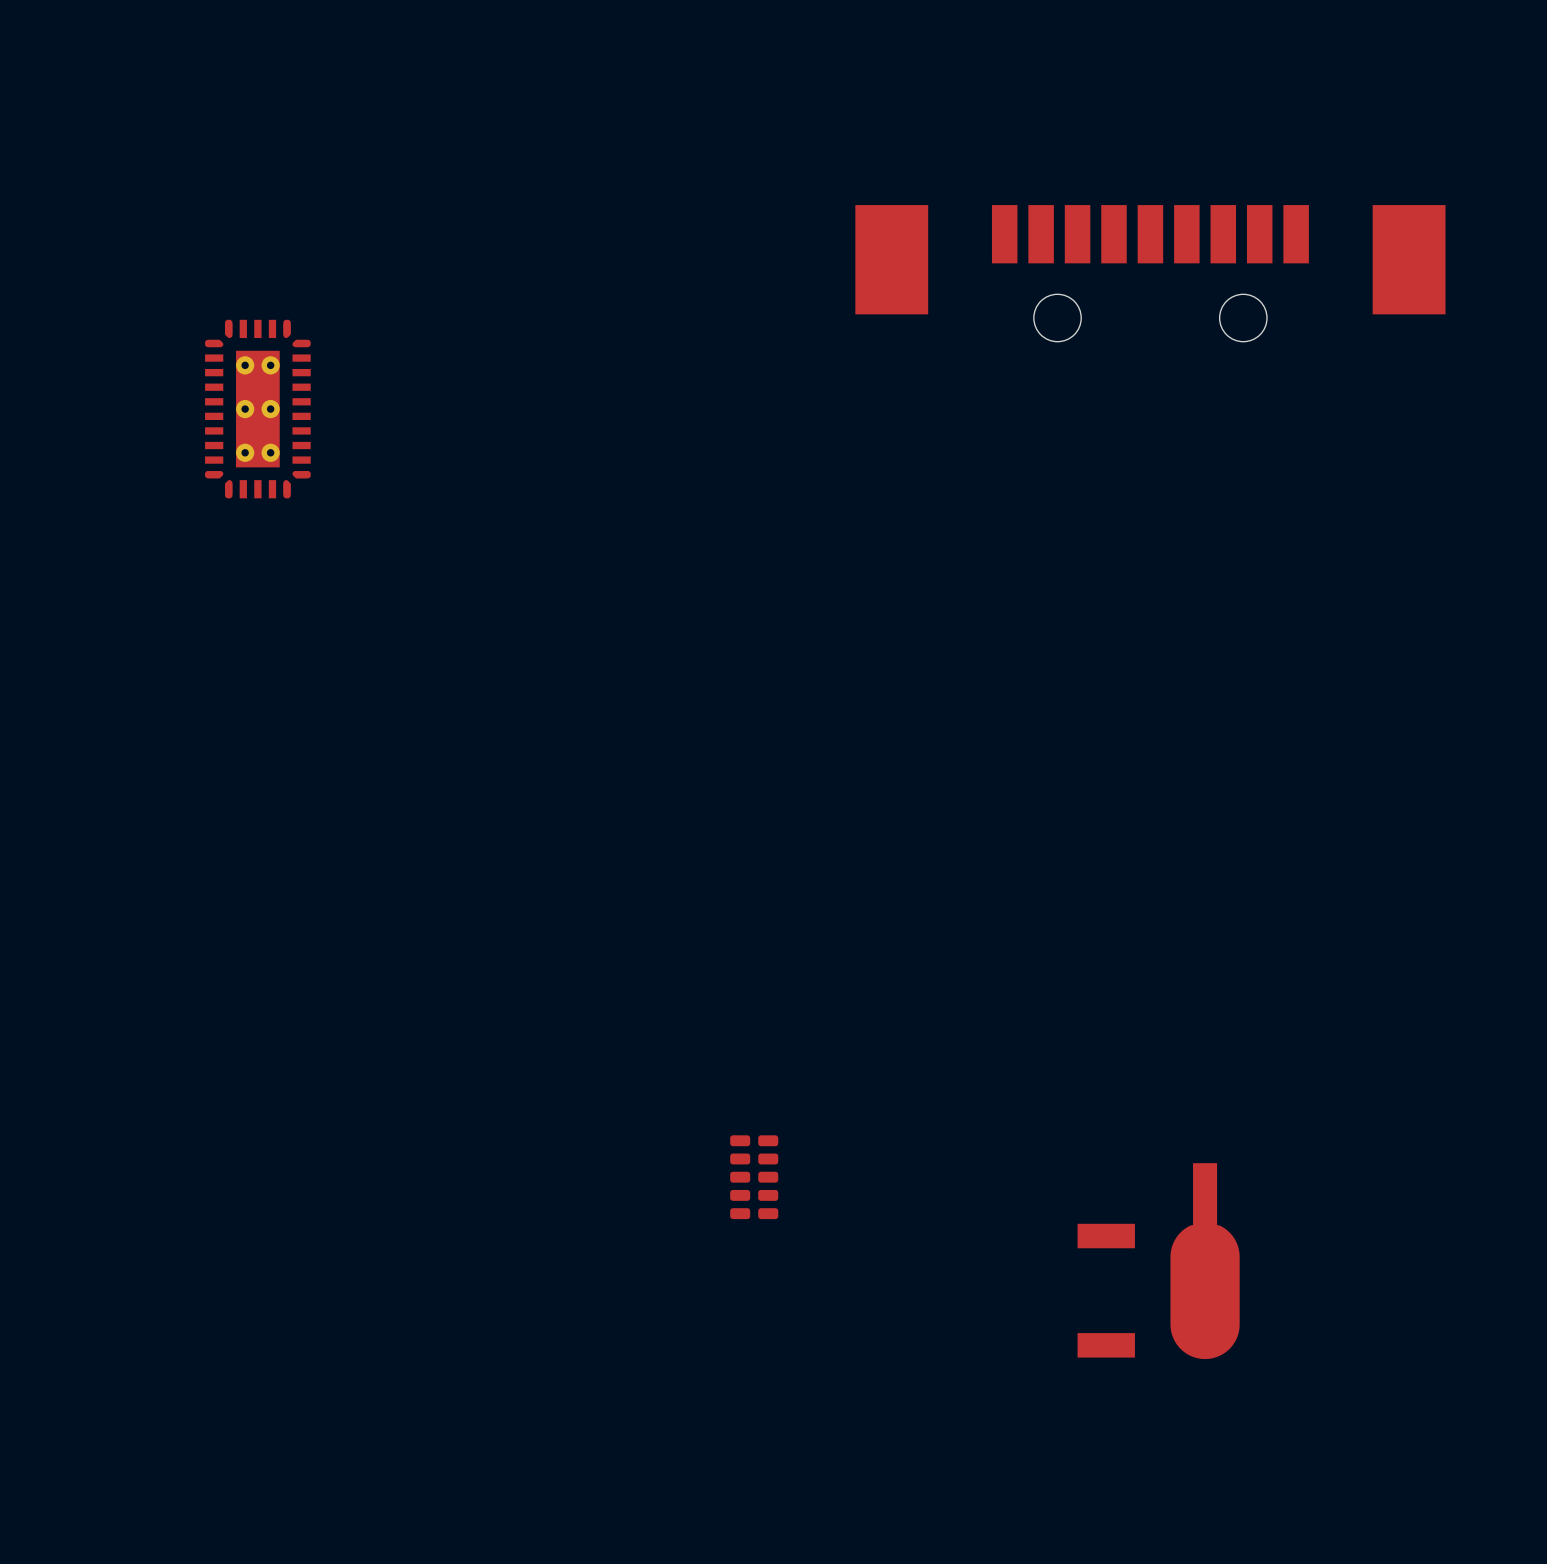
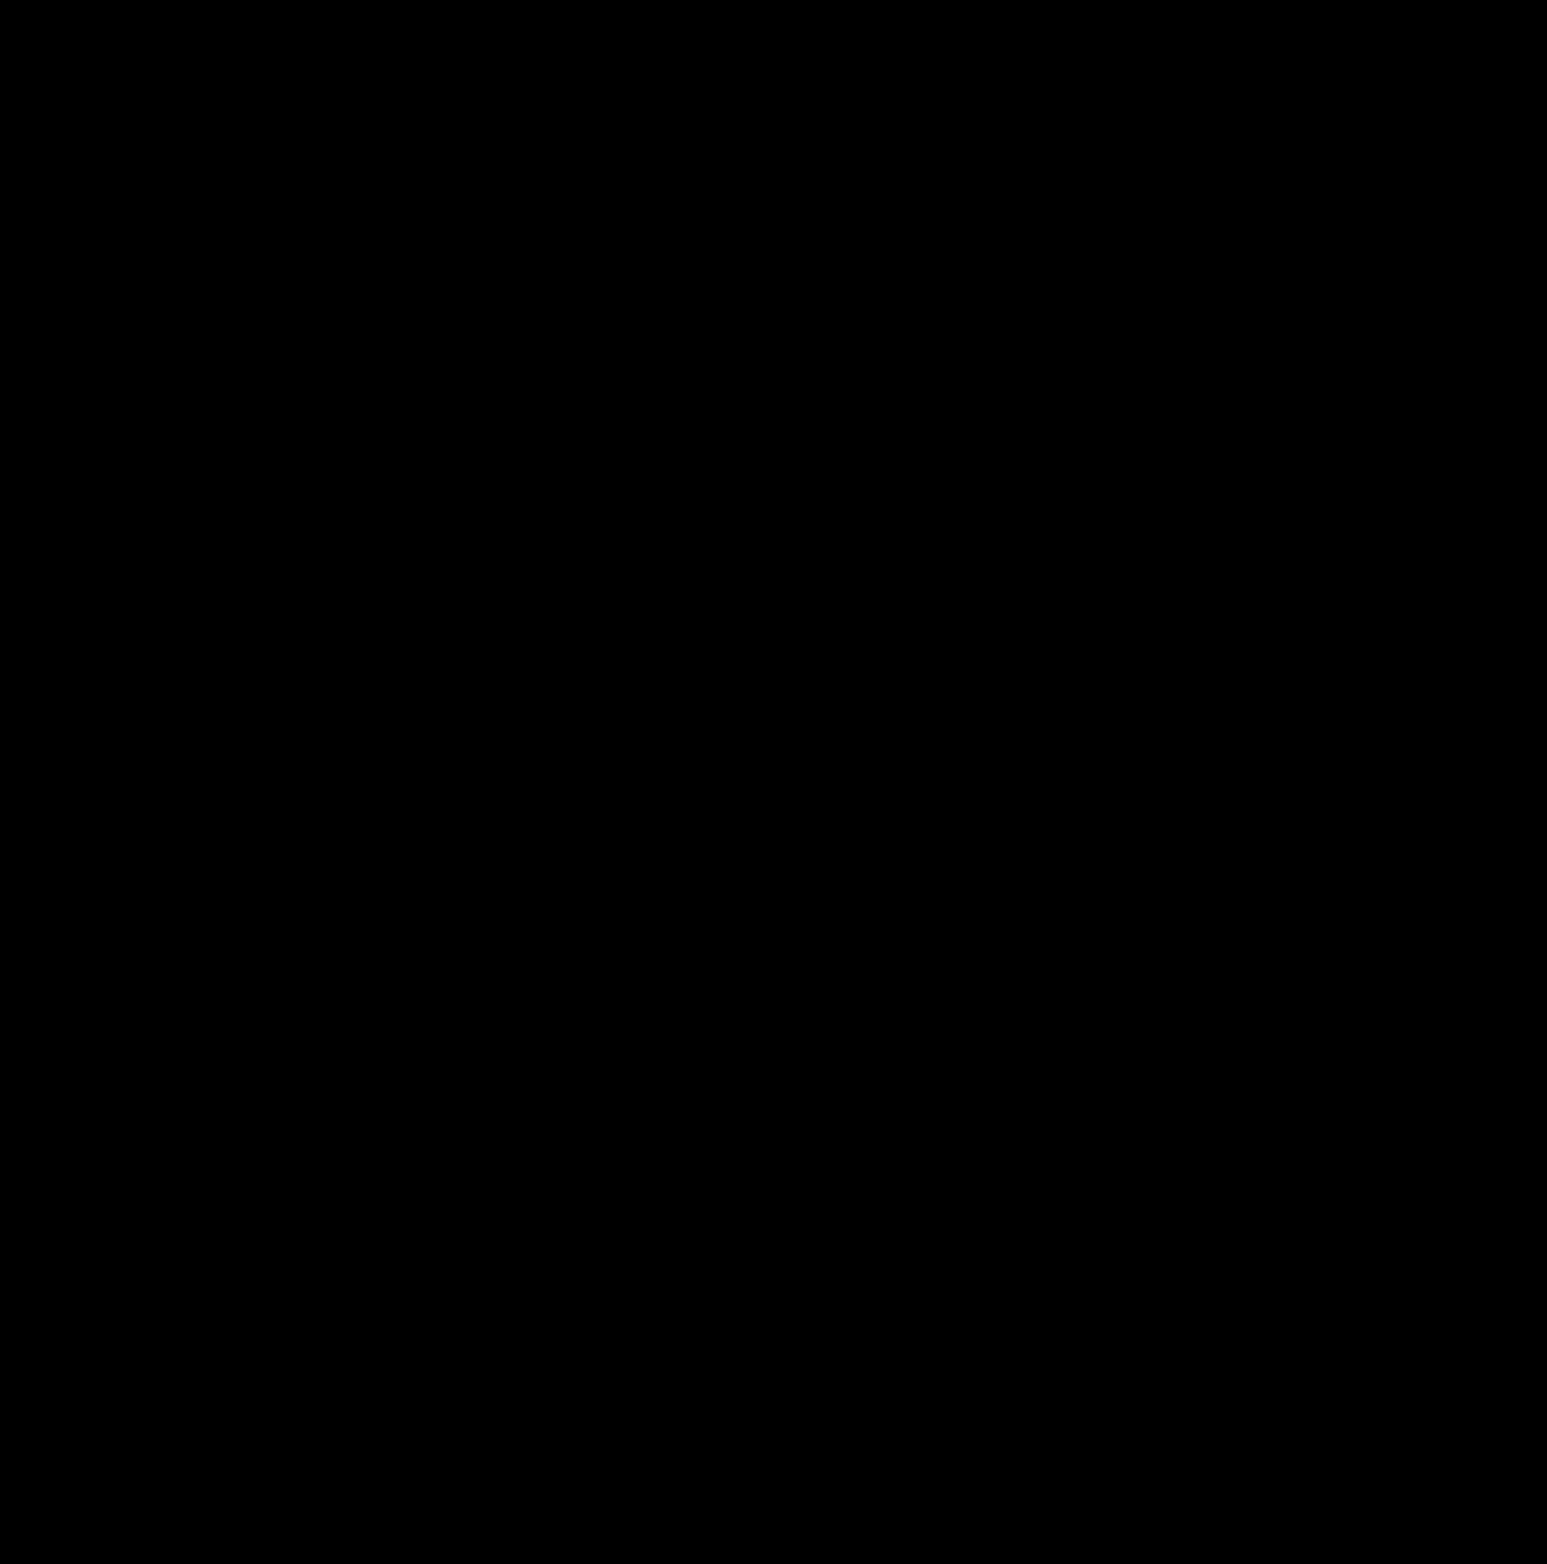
part: (1150, 273) -> none
part: (257, 409) -> none
part: (754, 1177) -> none
part: (1158, 1261) -> none

